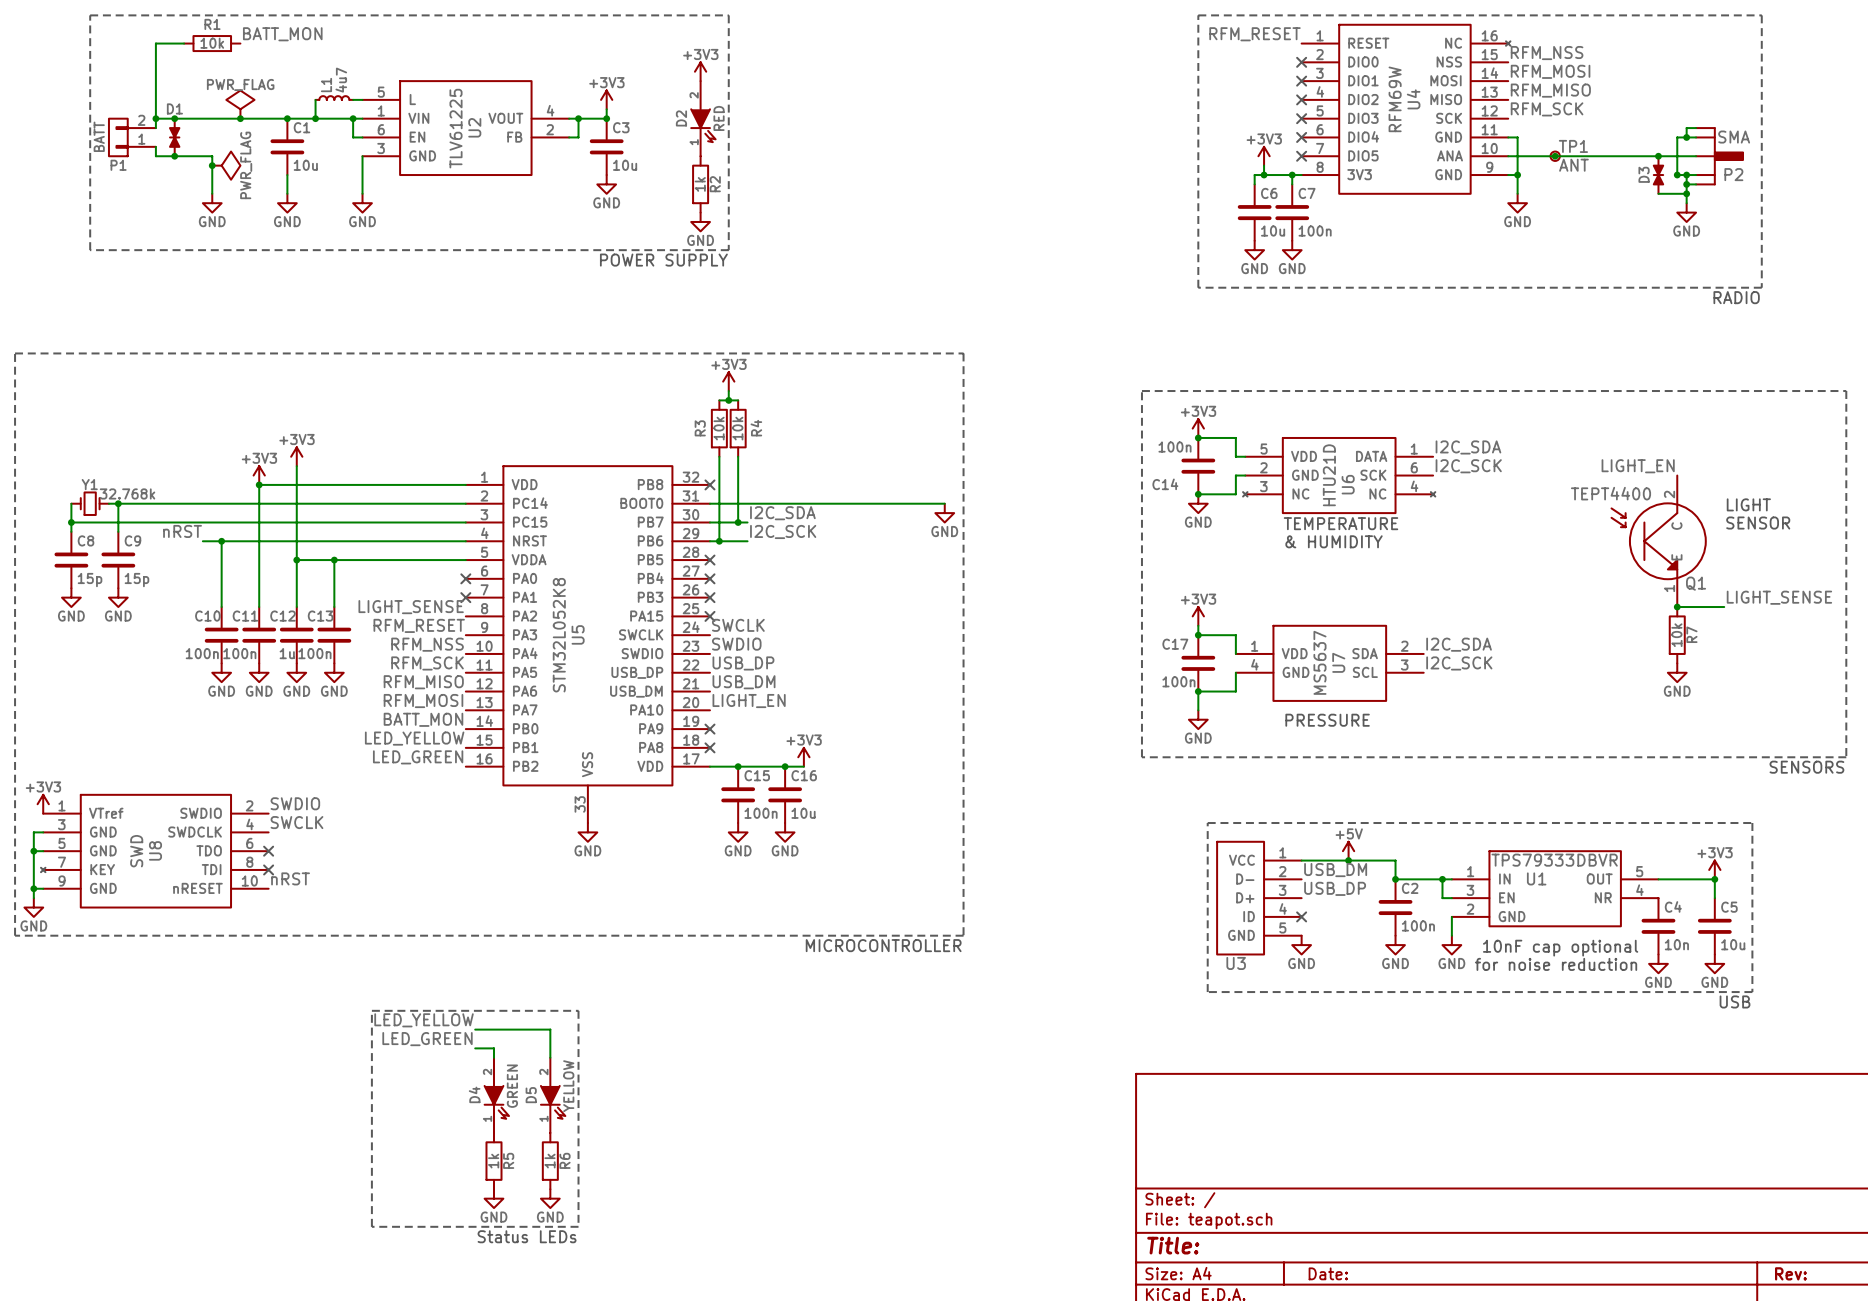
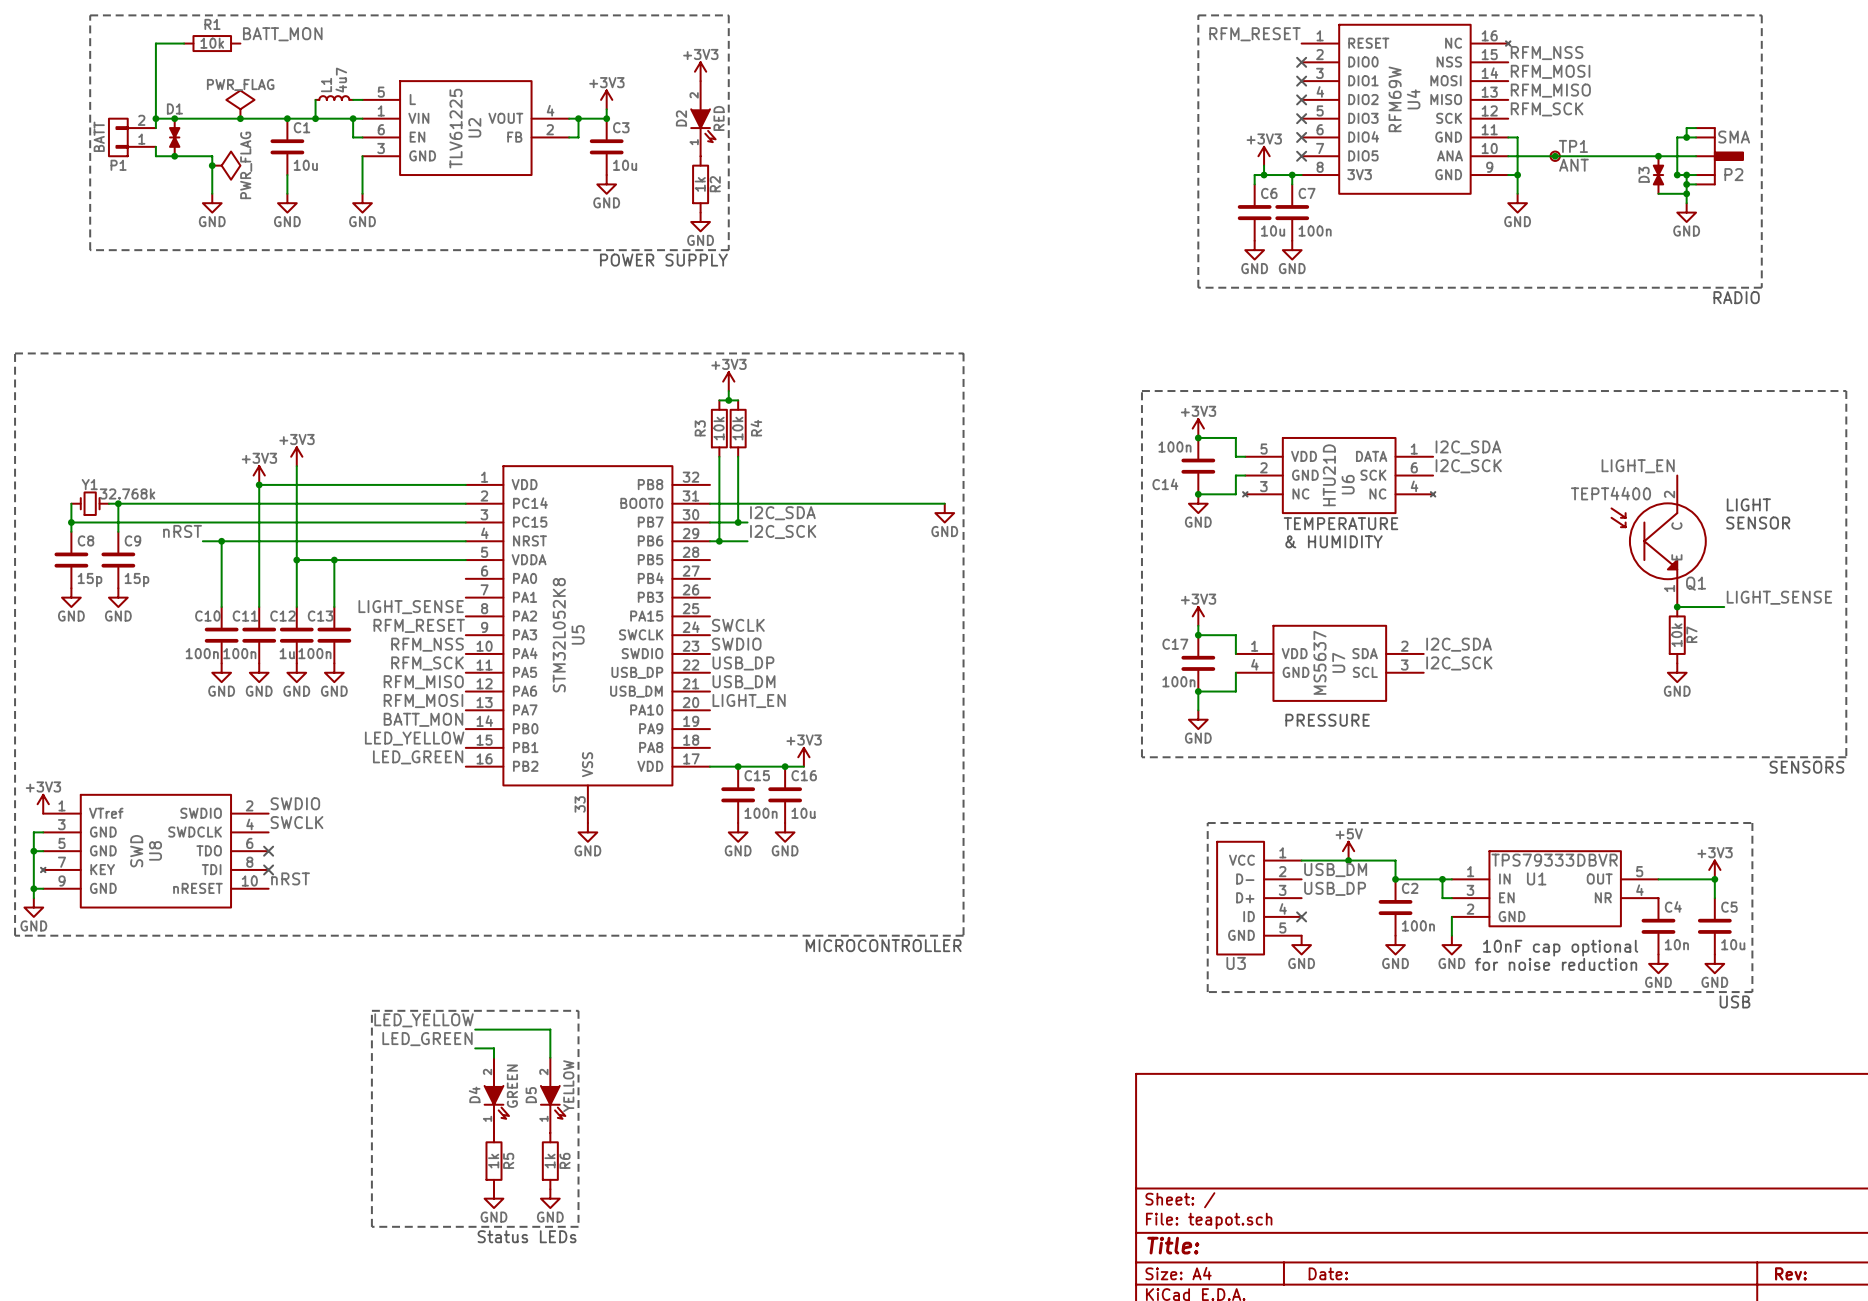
no-connect mark: (709, 484) -> none
no-connect mark: (709, 560) -> none
no-connect mark: (465, 578) -> none
no-connect mark: (709, 578) -> none
no-connect mark: (465, 597) -> none
no-connect mark: (709, 597) -> none
no-connect mark: (709, 616) -> none
no-connect mark: (709, 729) -> none
no-connect mark: (709, 747) -> none

